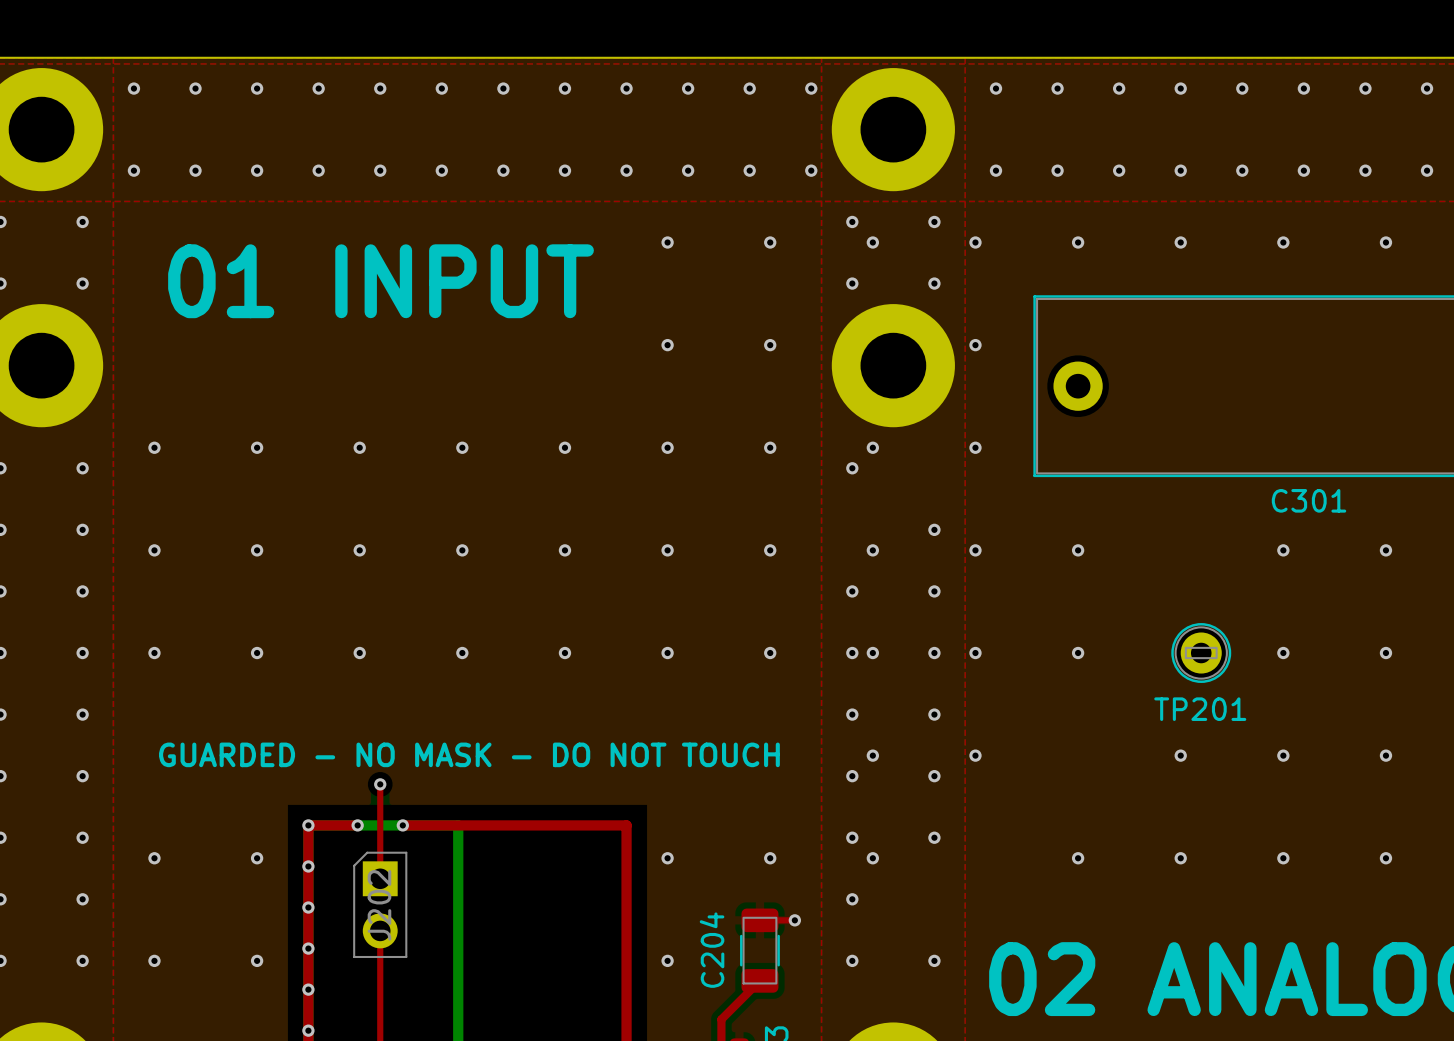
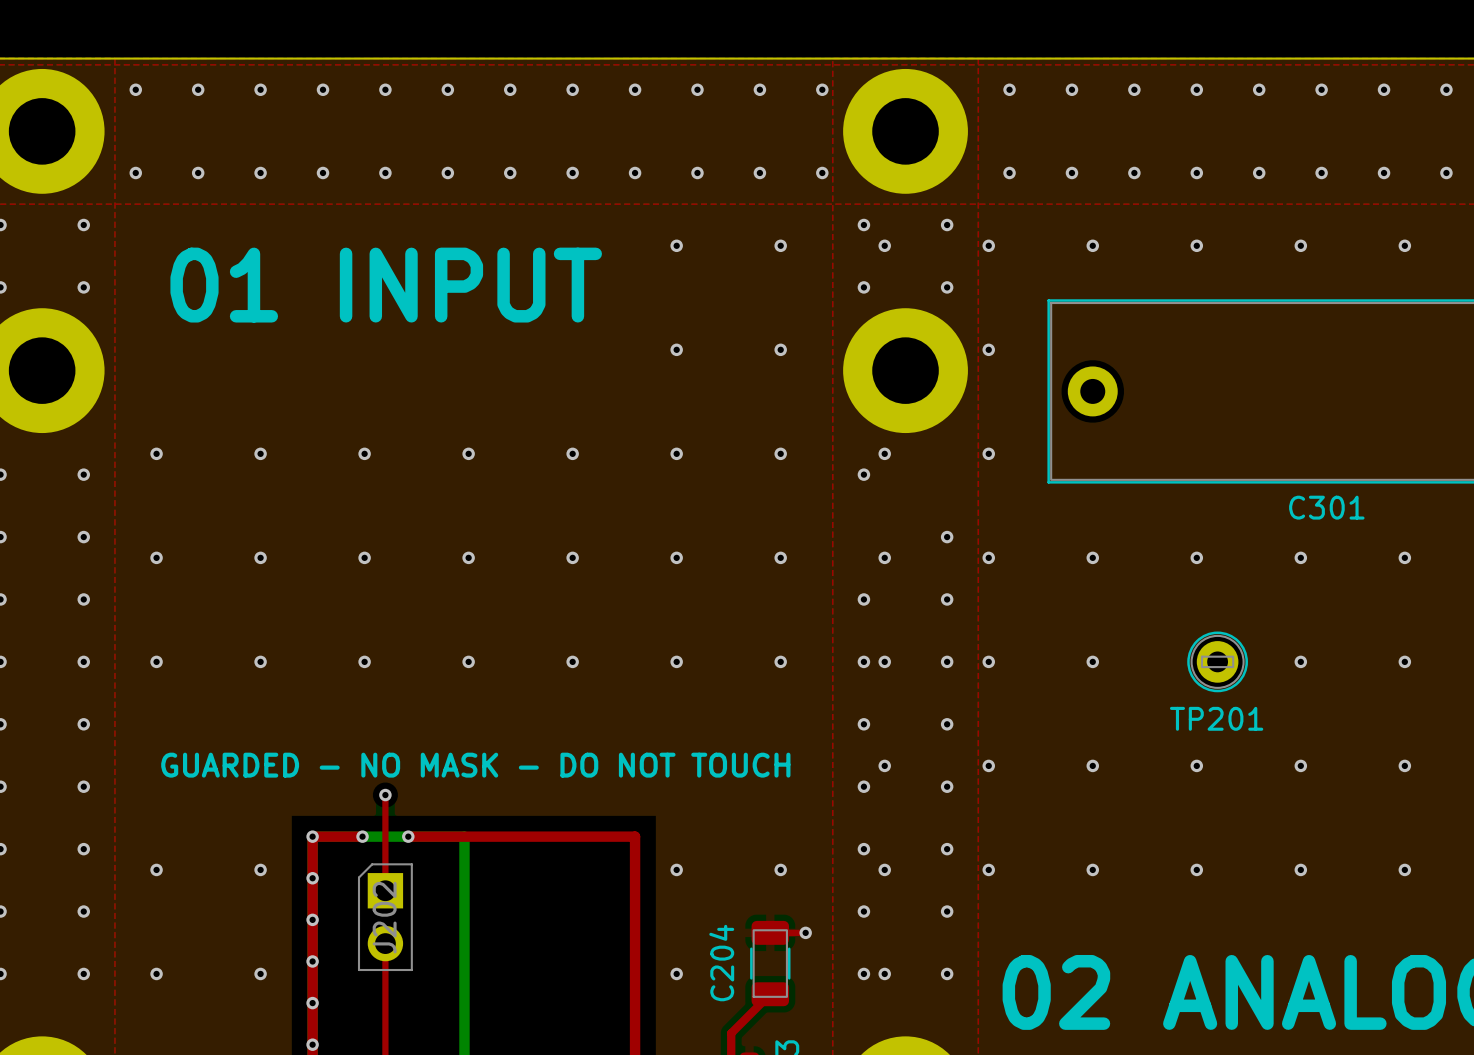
via: none -> (1196, 557)
via: none -> (1092, 765)
via: none -> (988, 869)
via: none -> (947, 911)
via: none -> (884, 973)

